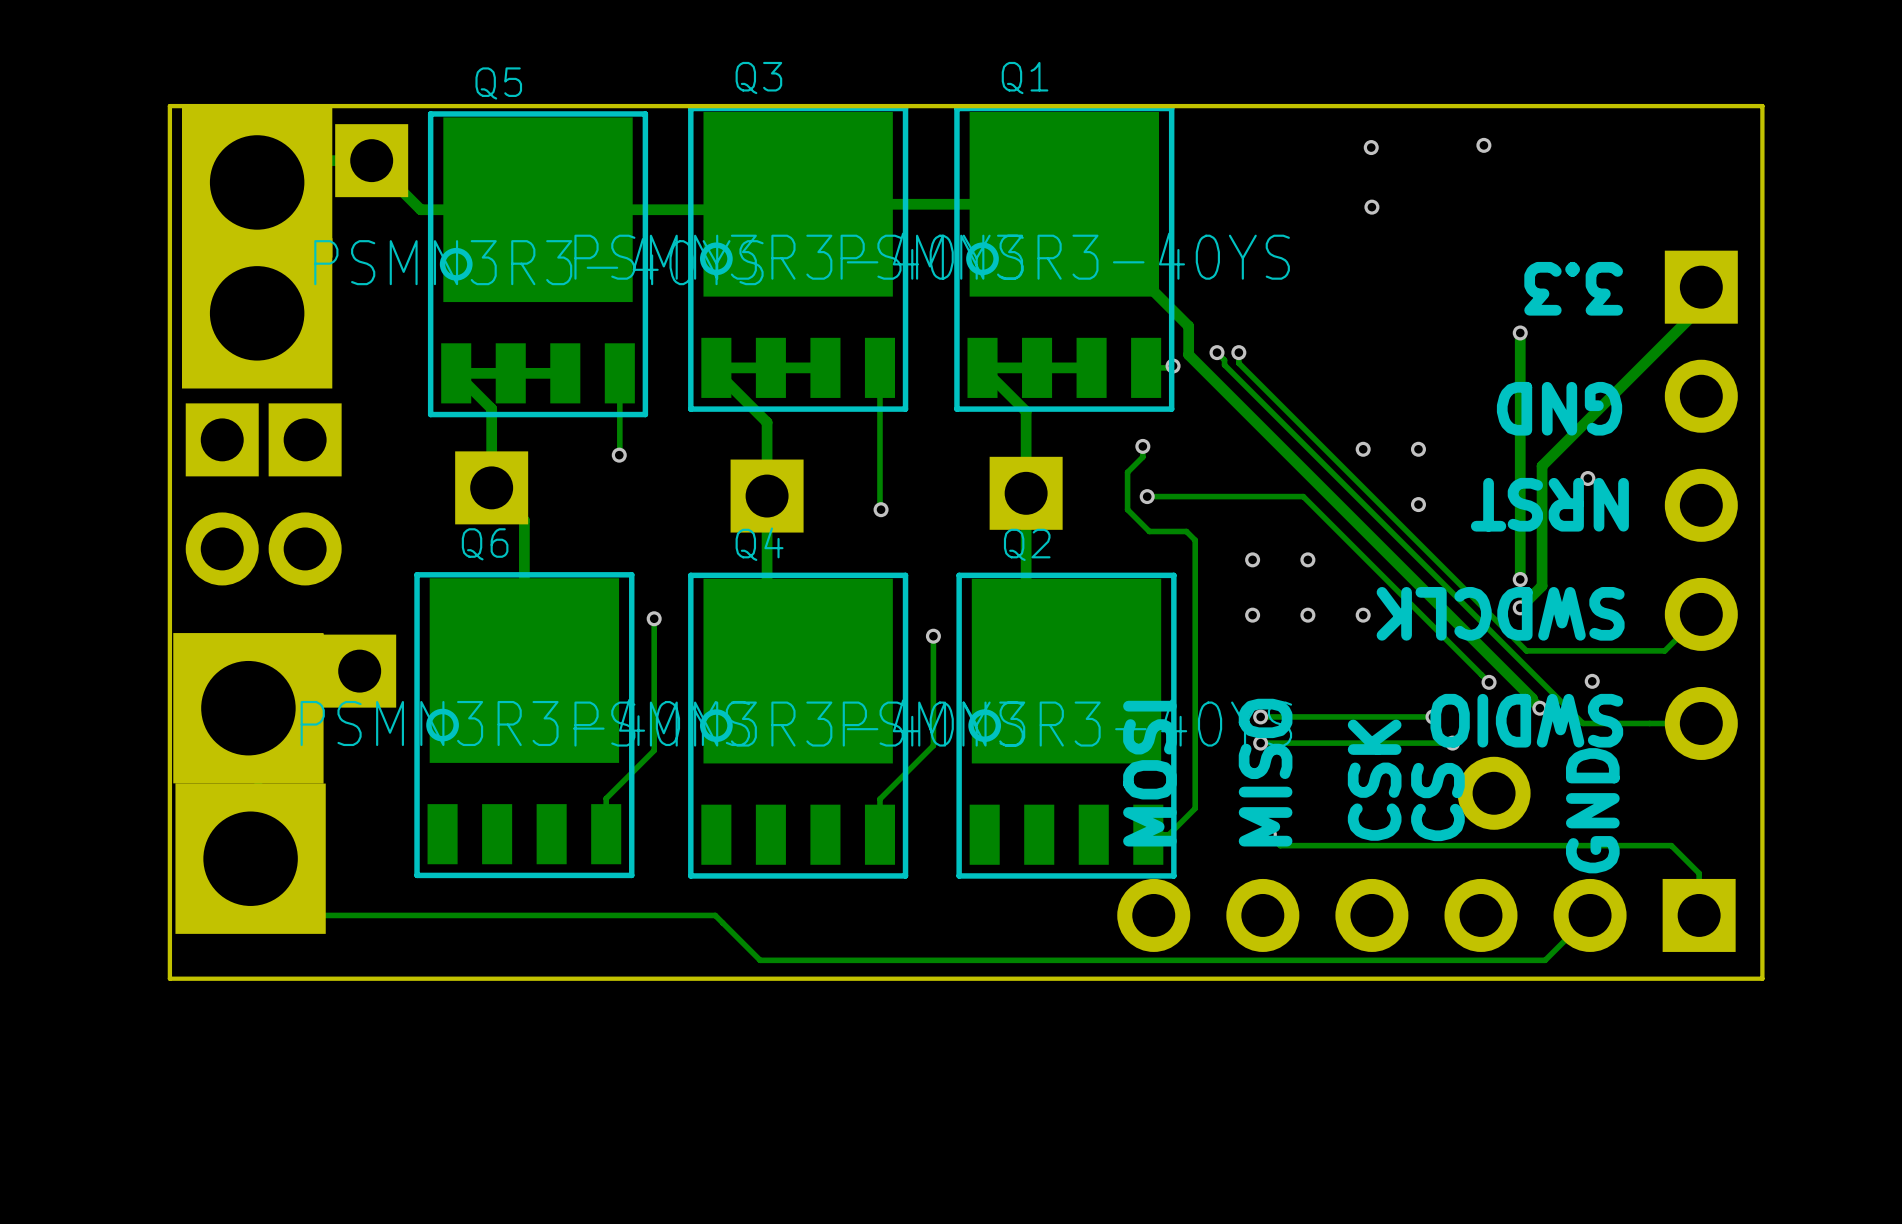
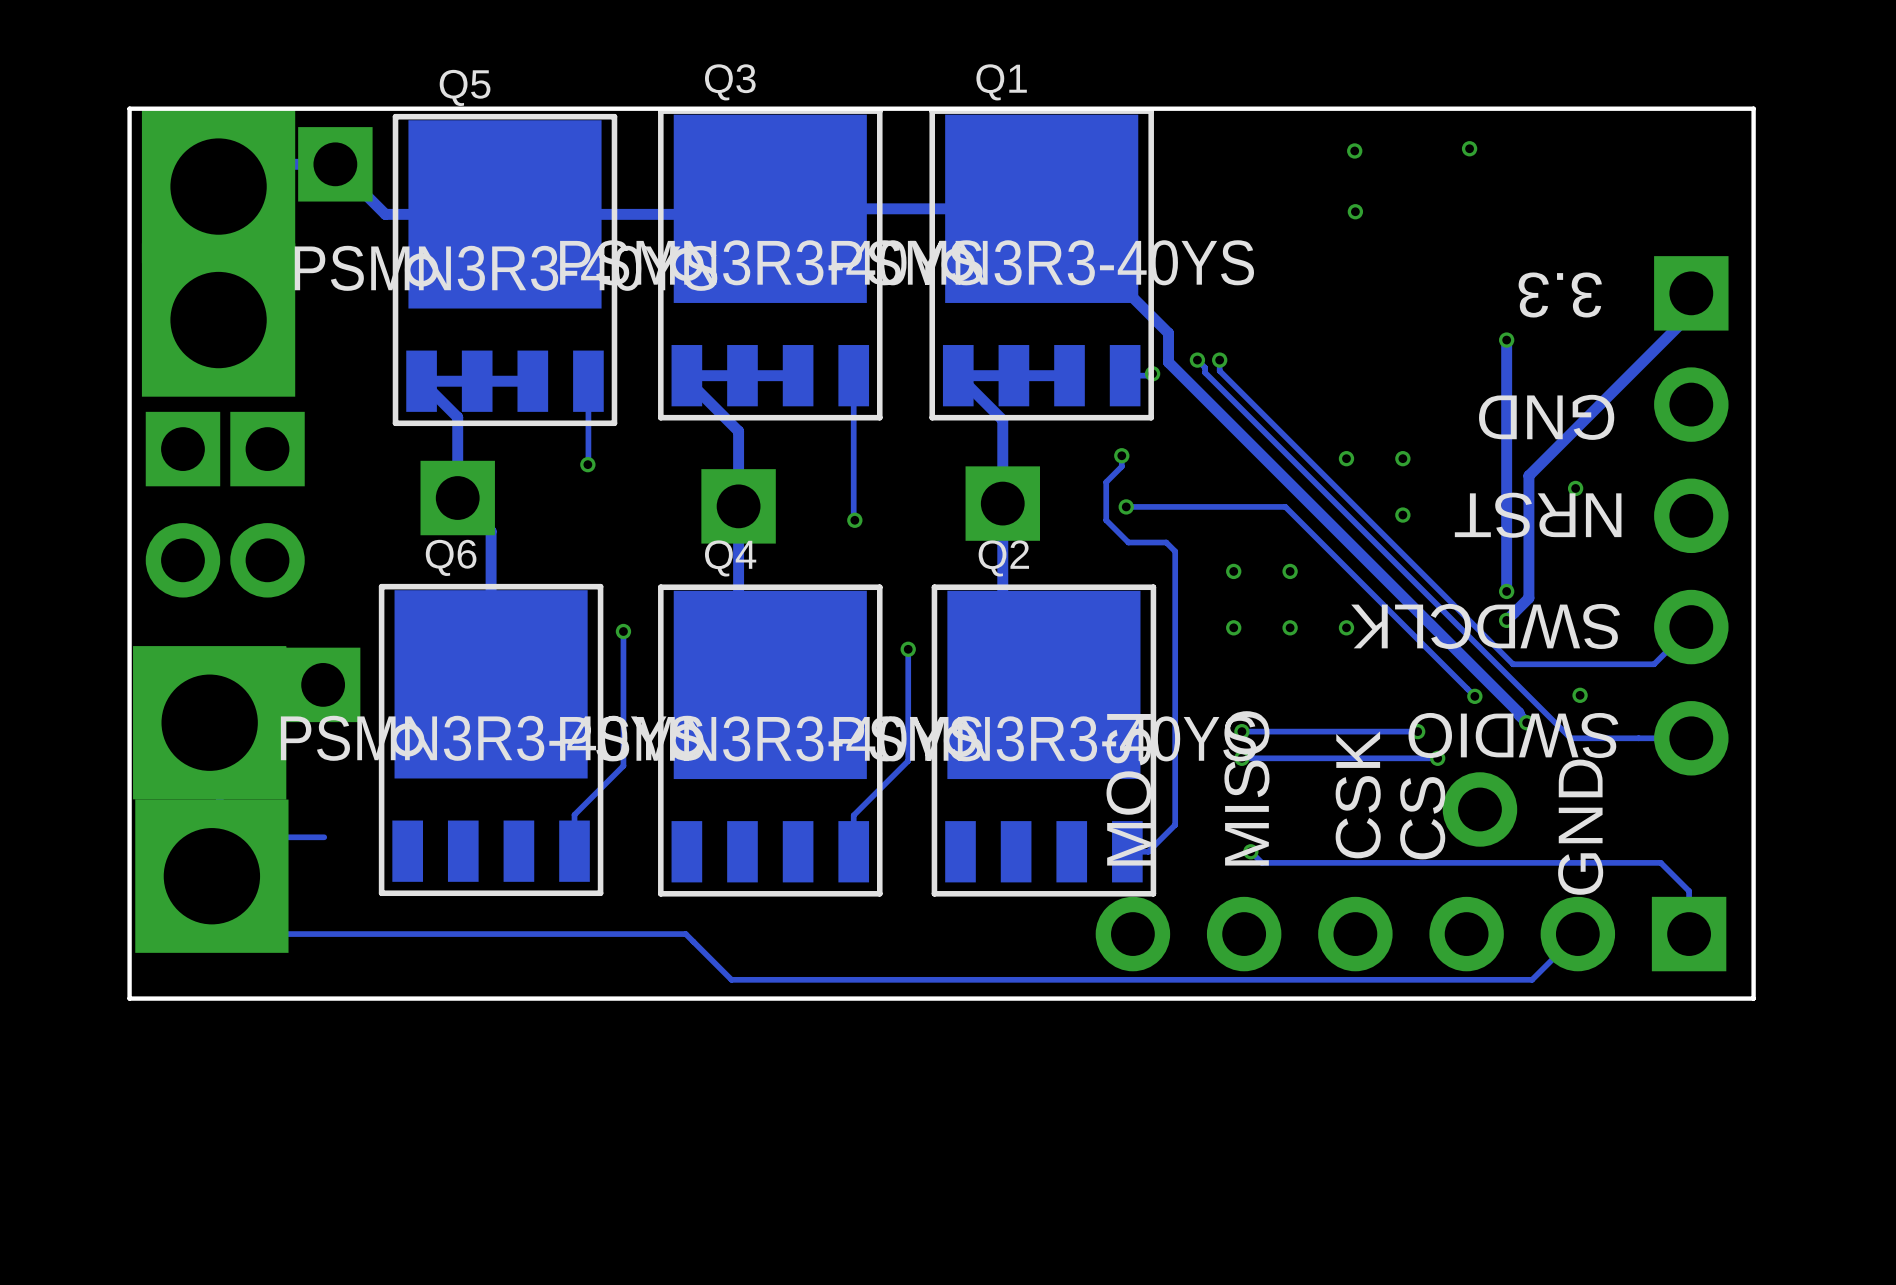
track: none -> (324, 837) (257, 837)

